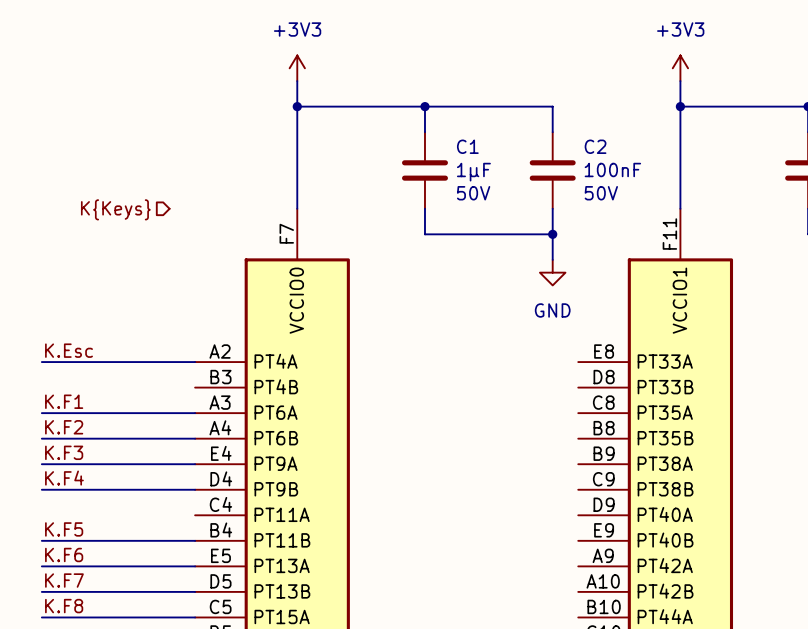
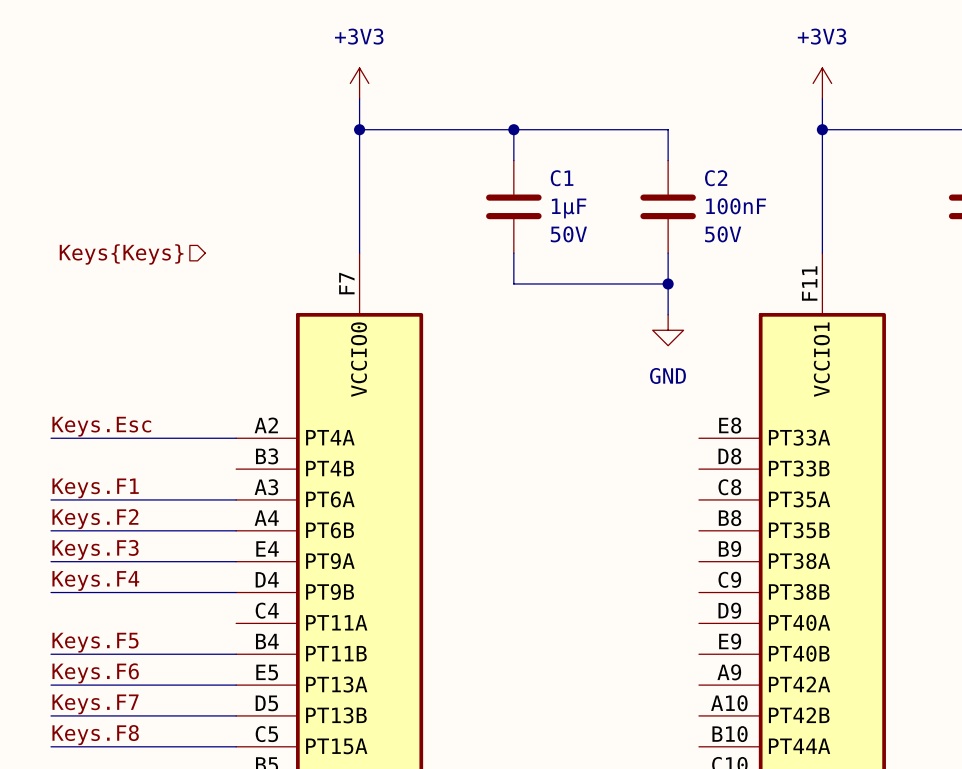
hierarchical label: K{Keys} (115, 209) -> Keys{Keys} (121, 254)
label: K.Esc (69, 350) -> Keys.Esc (101, 426)
label: K.F1 (64, 401) -> Keys.F1 (95, 488)
label: K.F2 (64, 427) -> Keys.F2 (95, 519)
label: K.F3 (64, 452) -> Keys.F3 (95, 549)
label: K.F4 (64, 478) -> Keys.F4 (95, 580)
label: K.F5 (64, 529) -> Keys.F5 (95, 642)
label: K.F6 (64, 554) -> Keys.F6 (95, 673)
label: K.F7 (64, 580) -> Keys.F7 (95, 704)
label: K.F8 (64, 606) -> Keys.F8 (95, 735)

